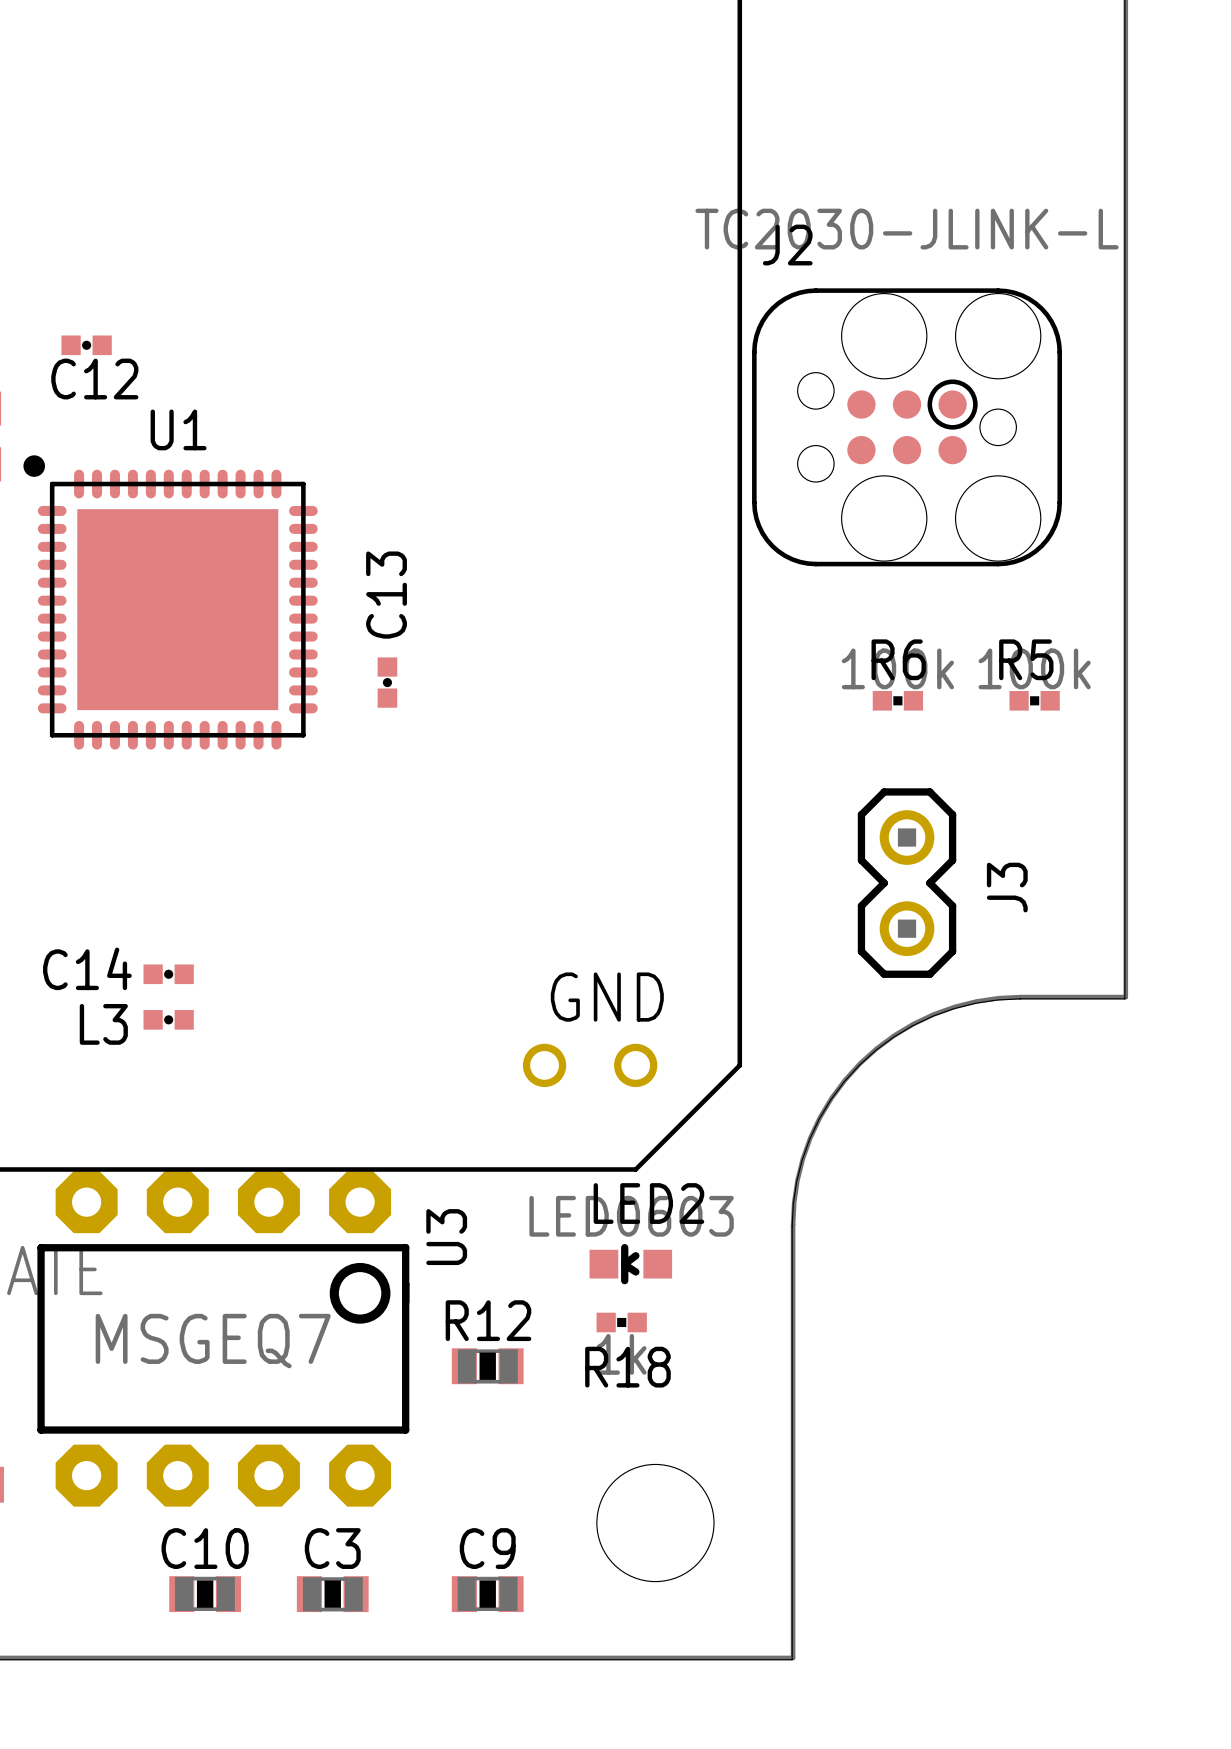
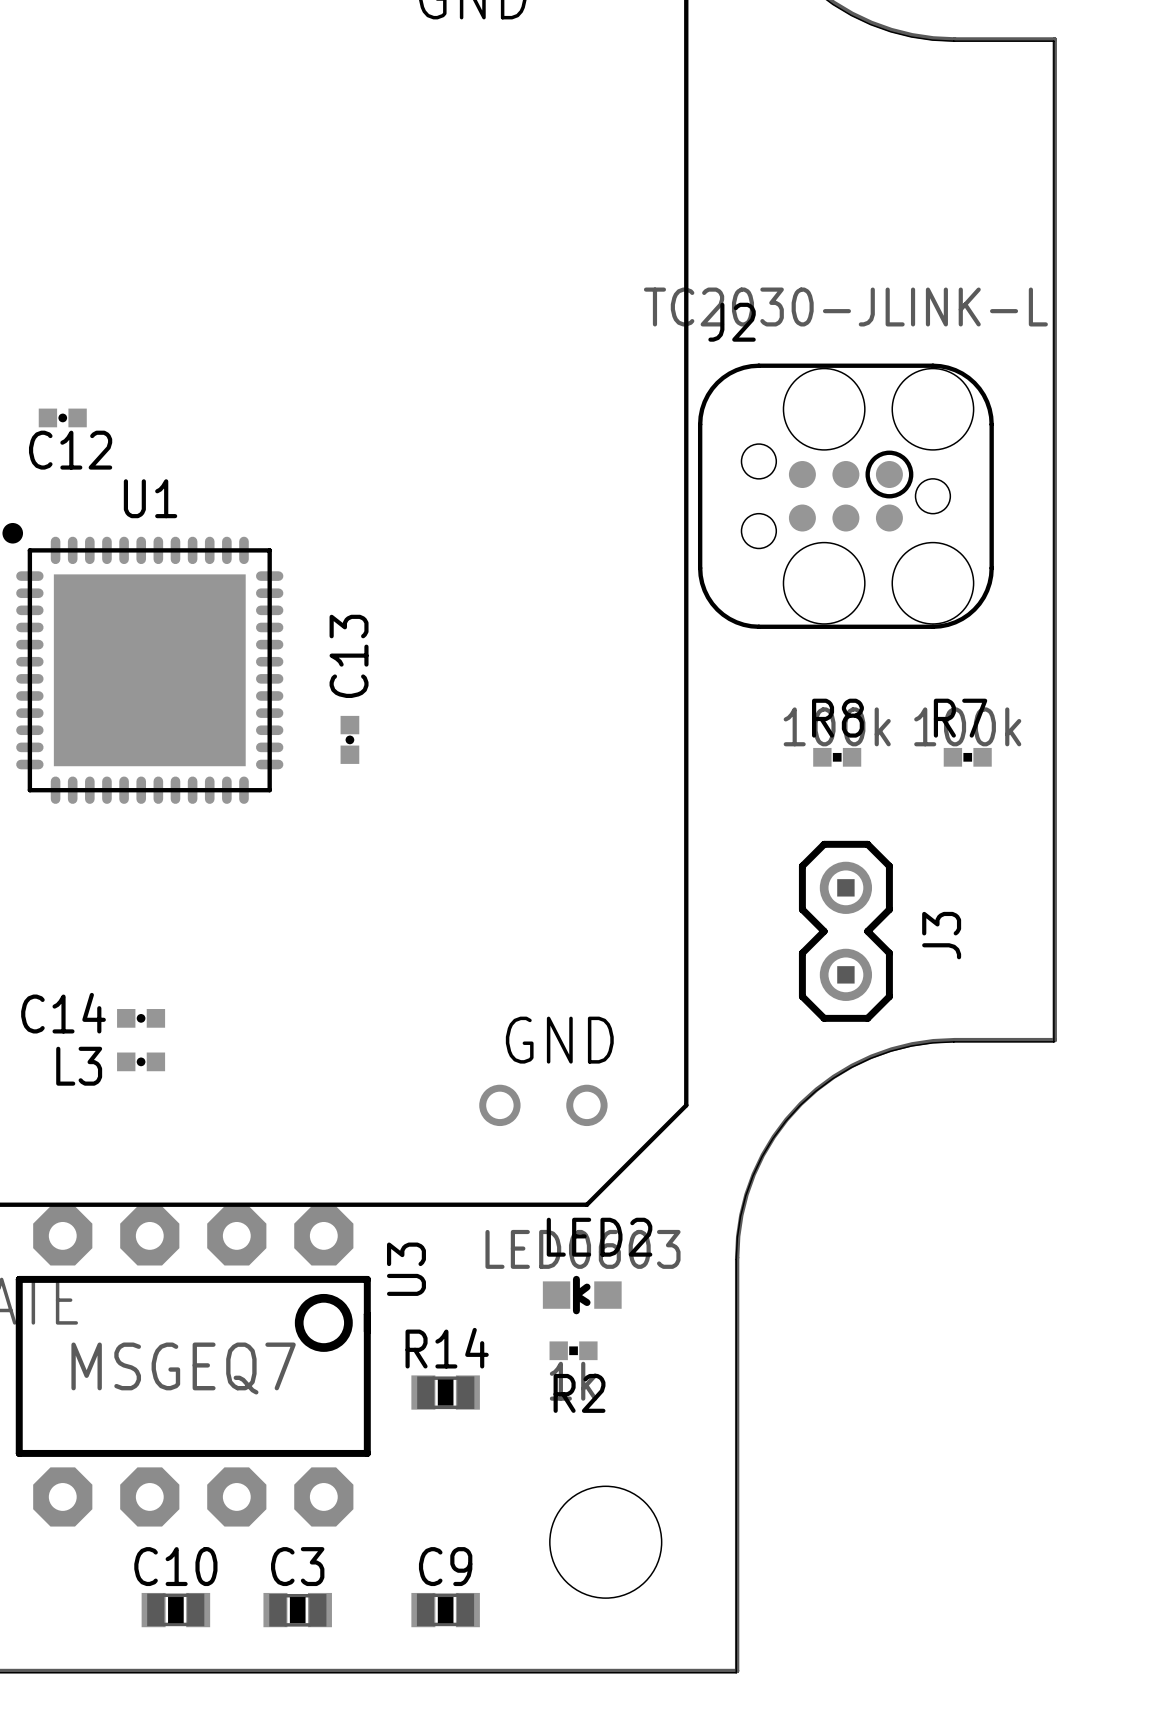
R6 name: R6 (898, 659) -> R8 (837, 718)
R5 name: R5 (1026, 659) -> R7 (960, 718)
R12 name: R12 (488, 1320) -> R14 (447, 1348)
R18 name: R18 (627, 1367) -> R2 (579, 1393)

